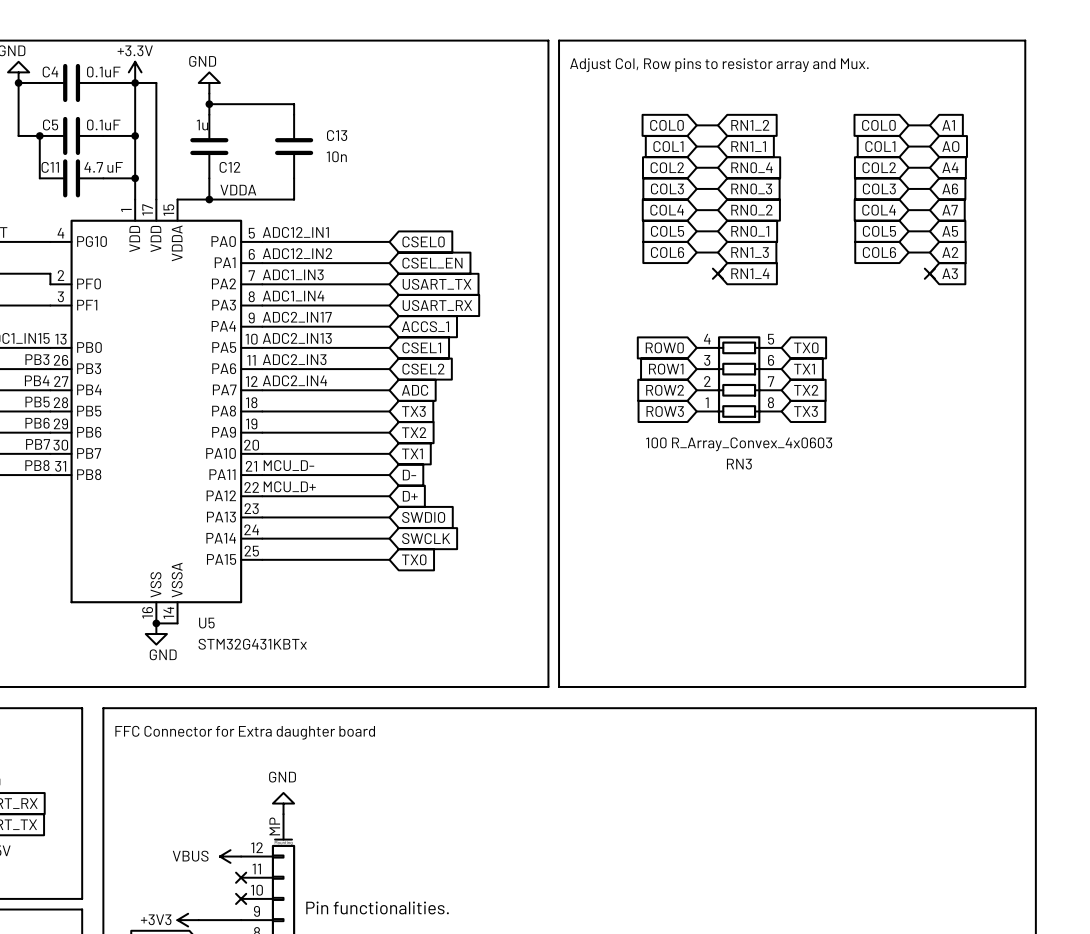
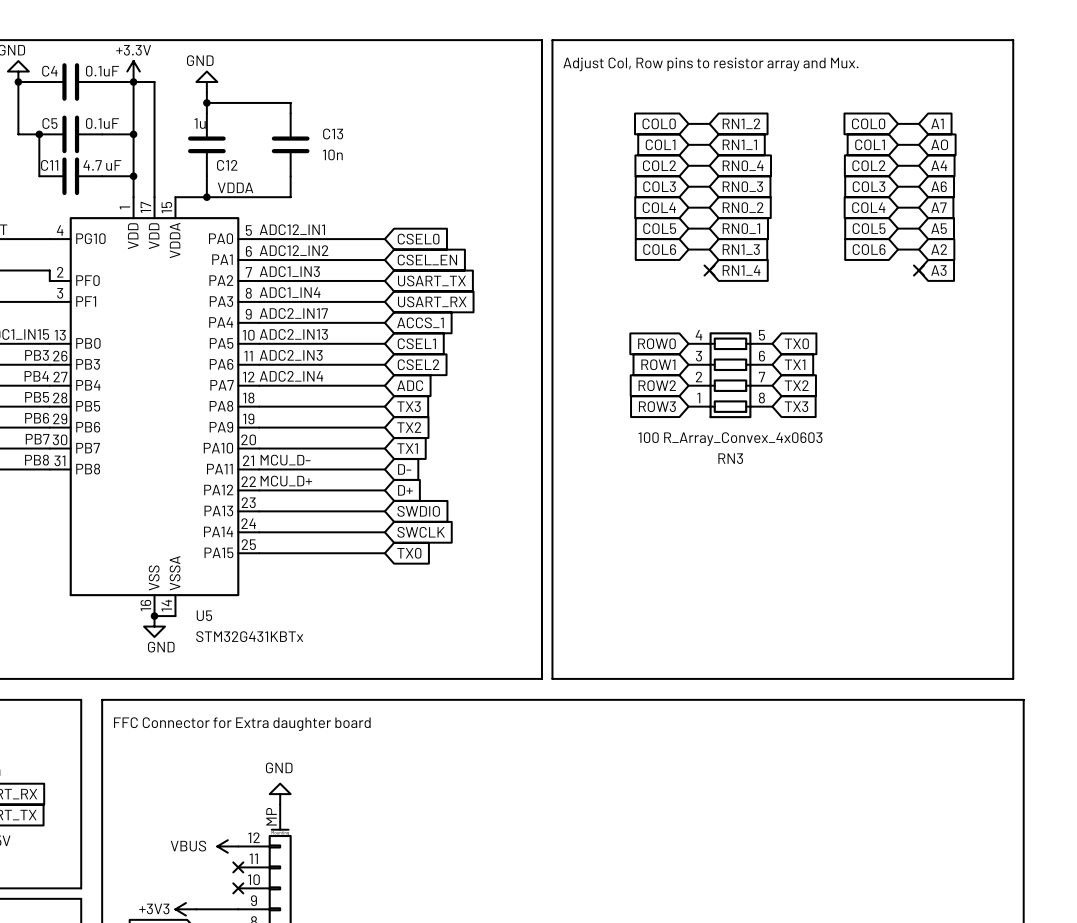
text: Pin functionalities. (377, 907) -> none

